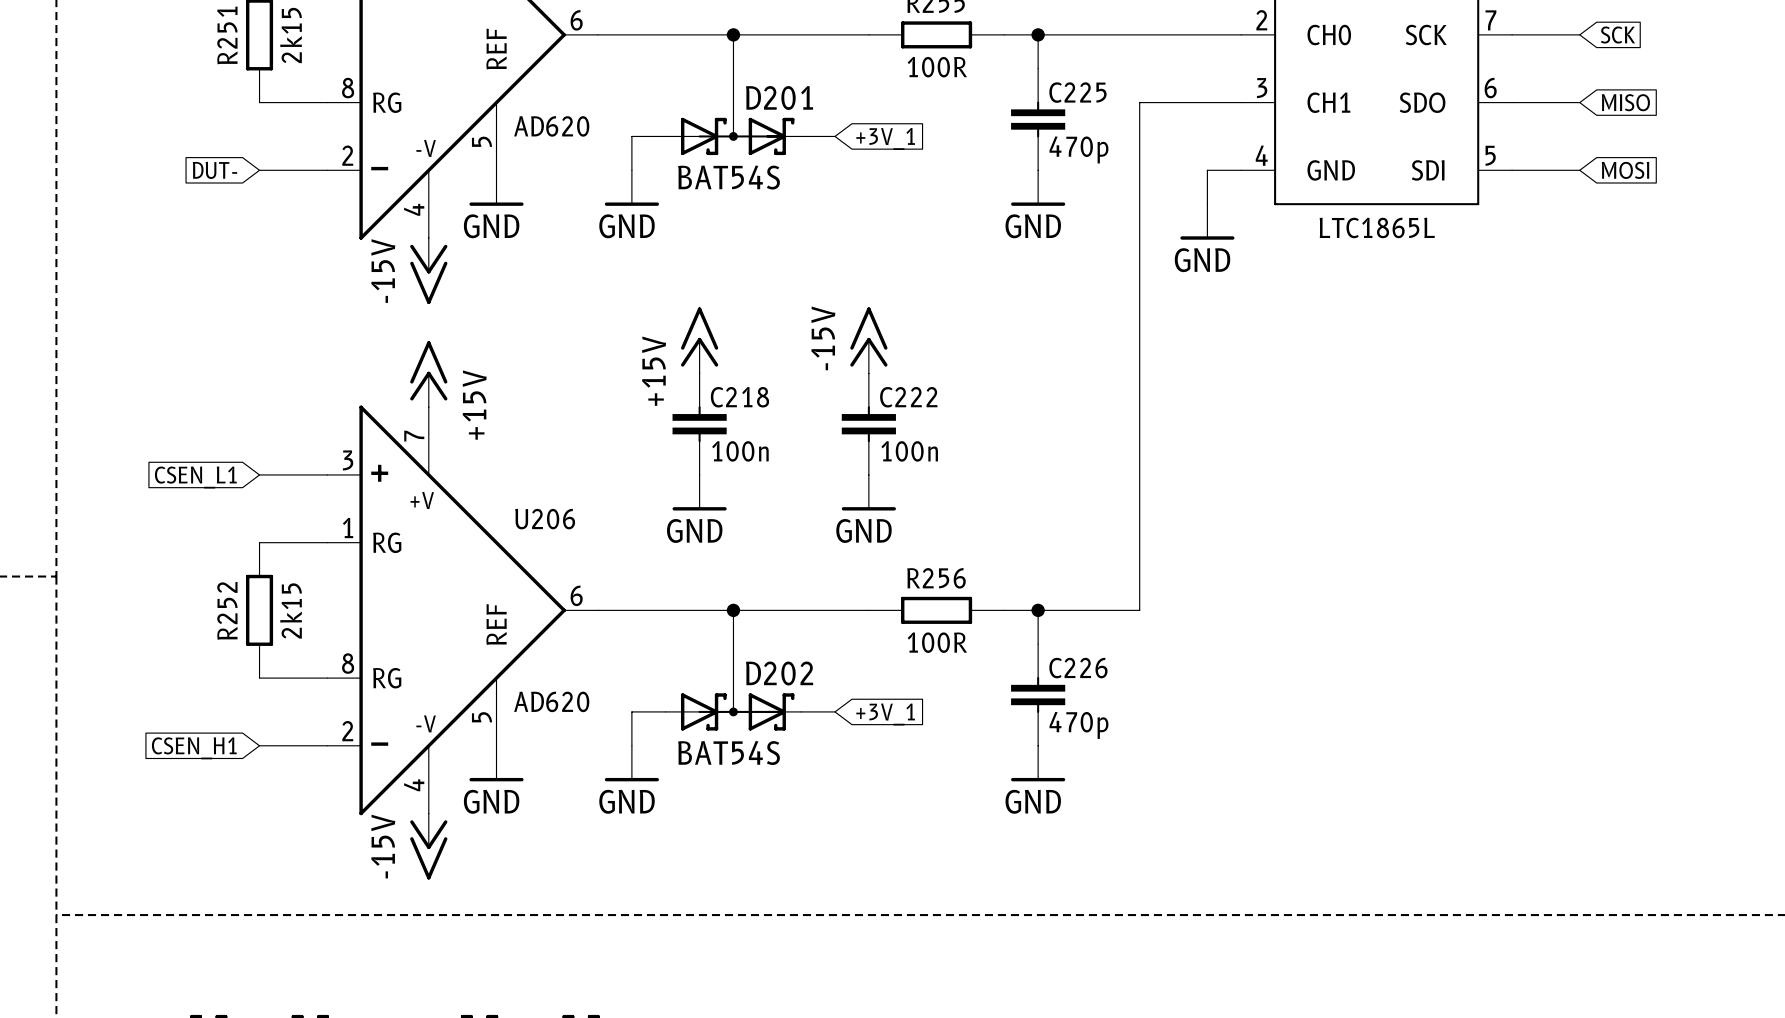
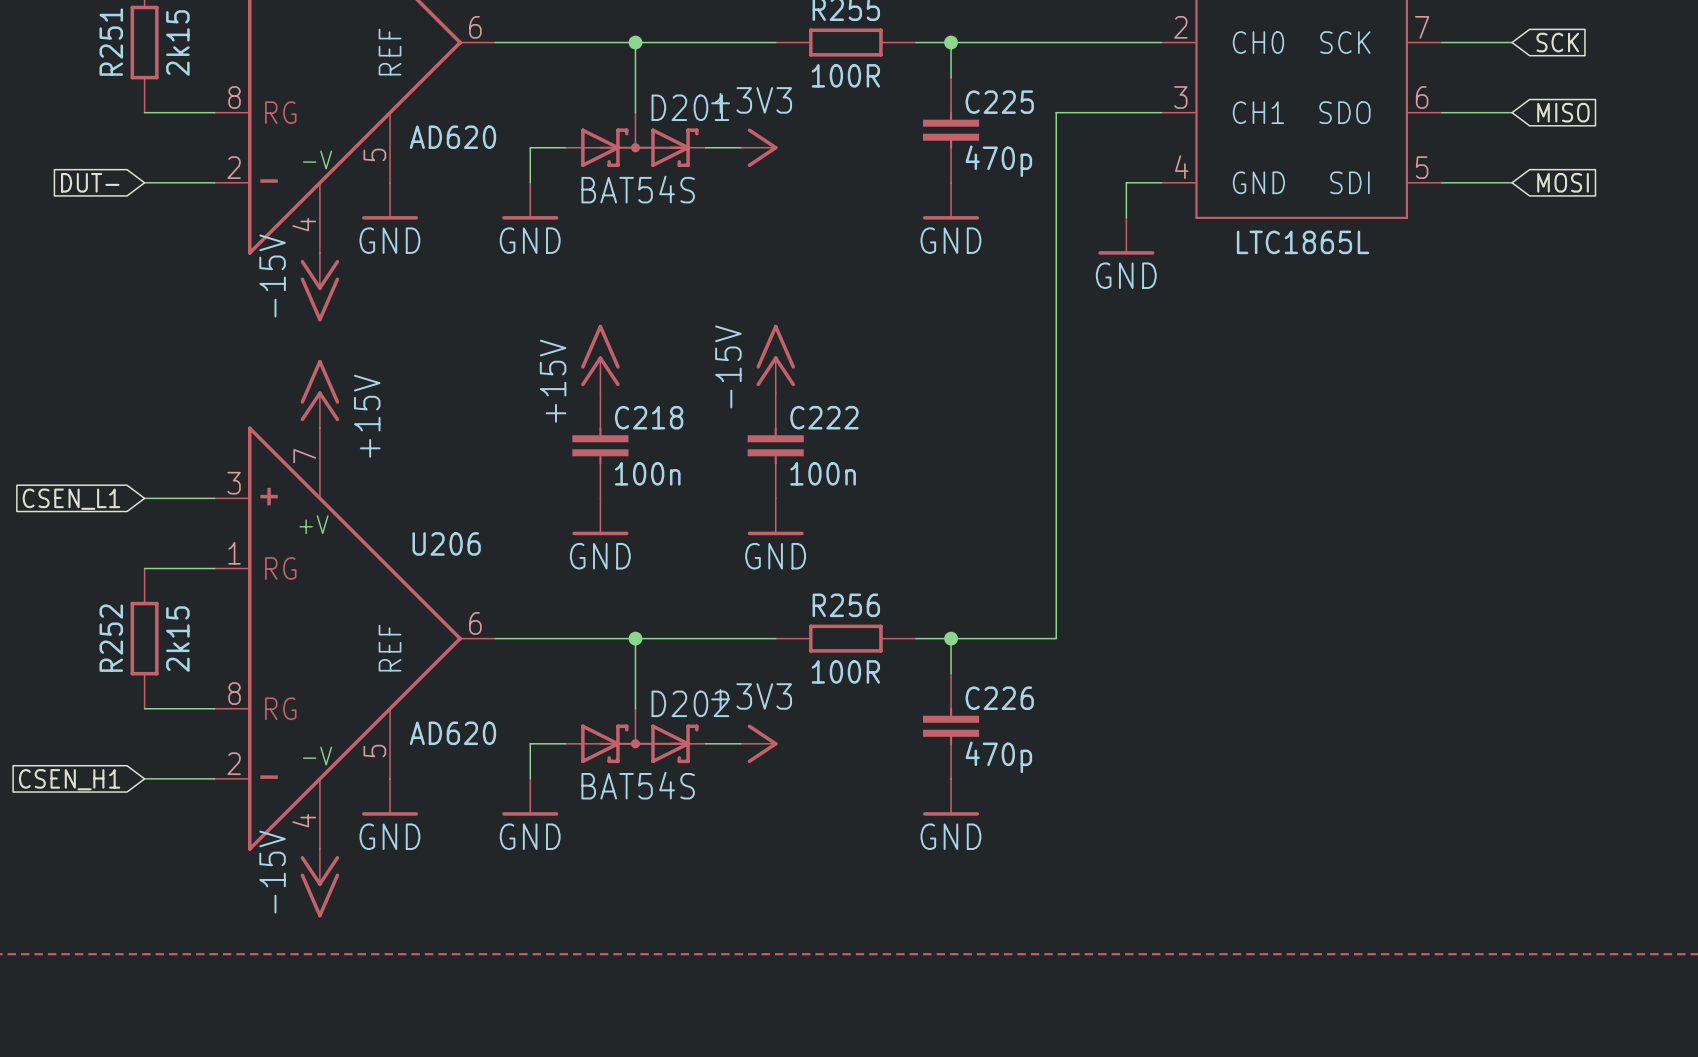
power symbol: none -> +3V3 (759, 147)
global label: +3V_1 (885, 138) -> none
power symbol: none -> +3V3 (759, 743)
global label: +3V_1 (885, 714) -> none

